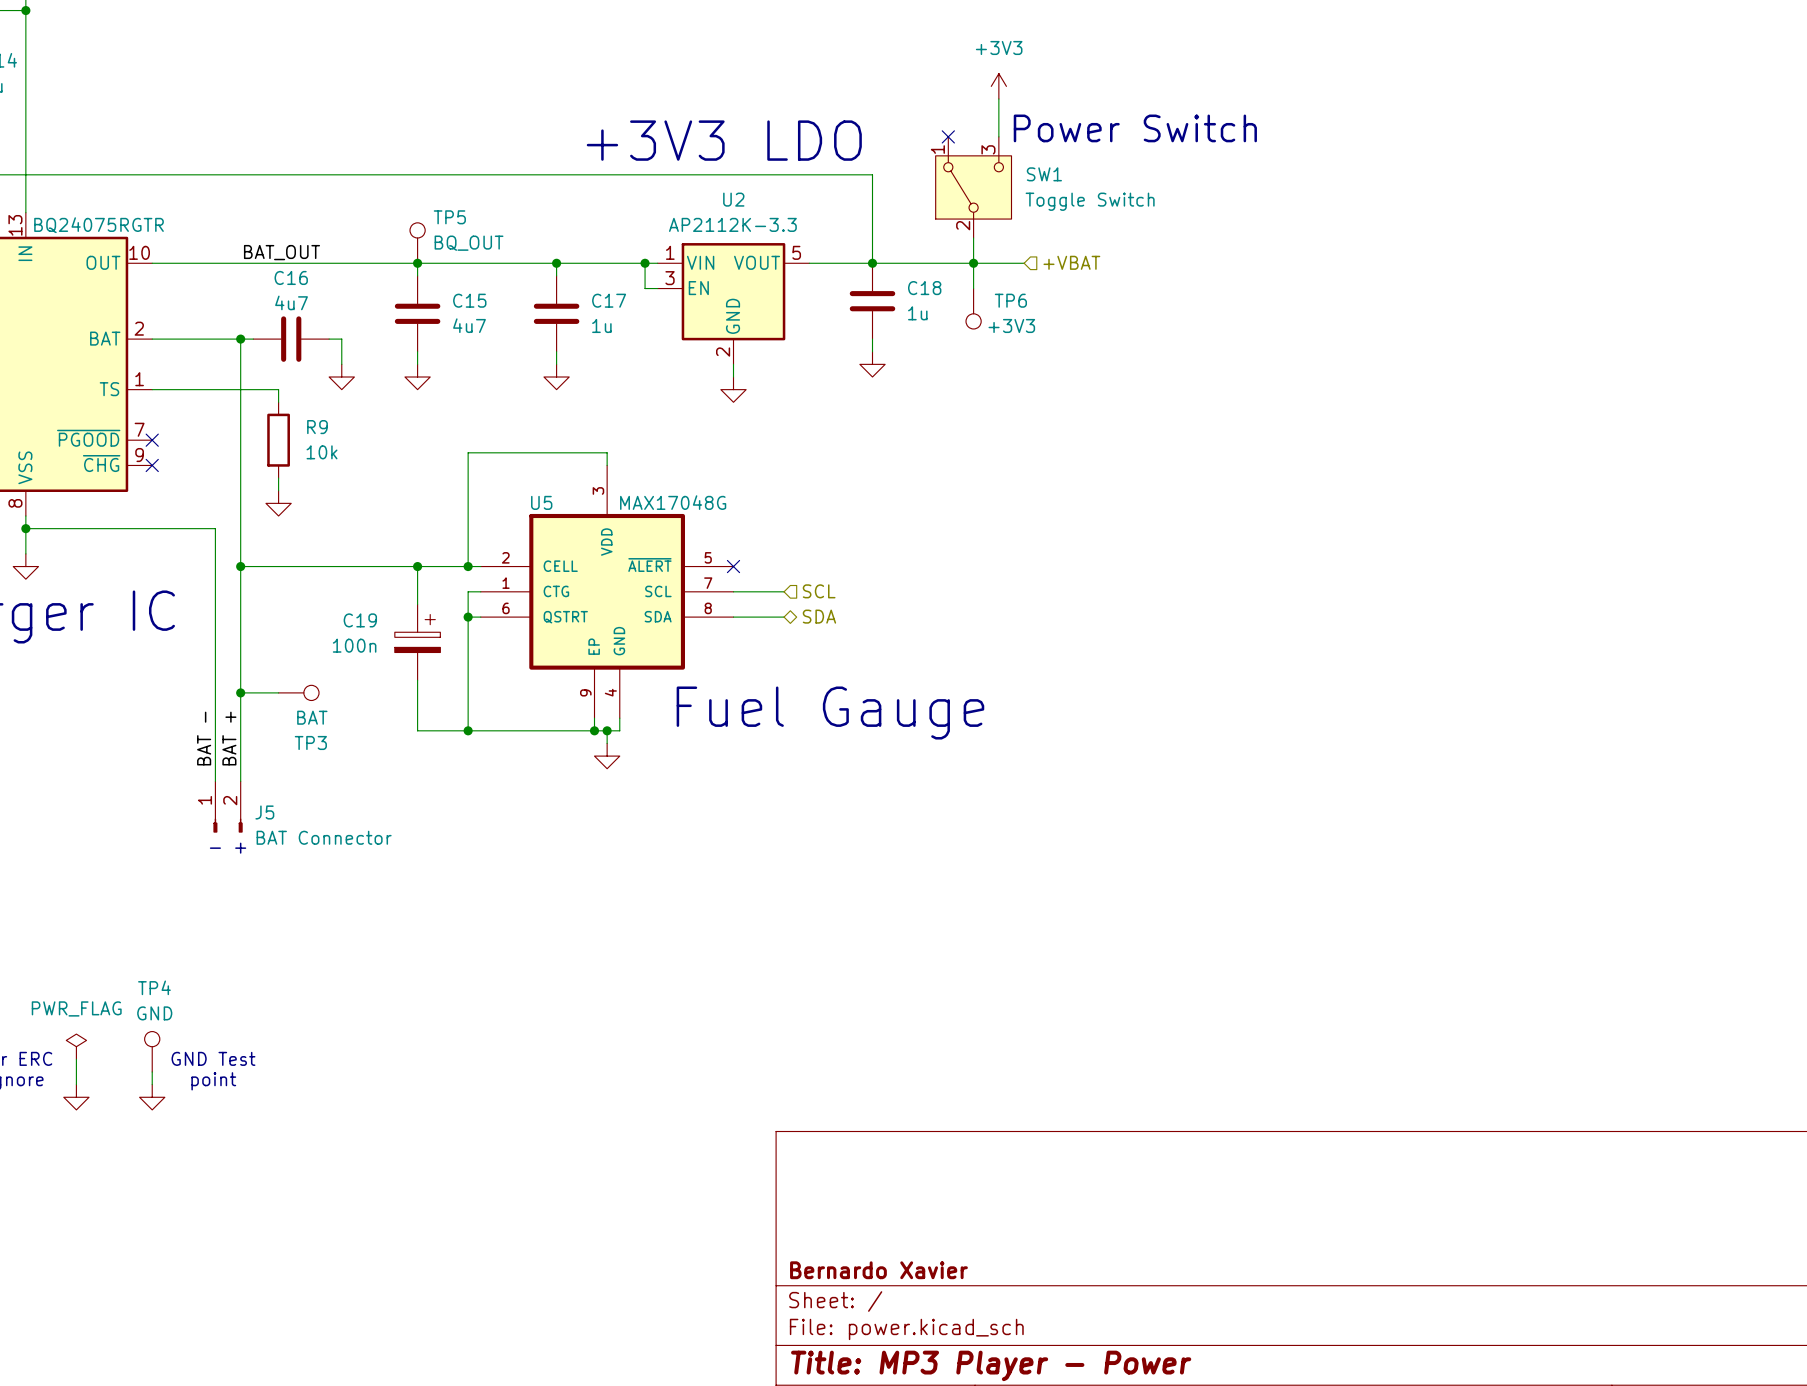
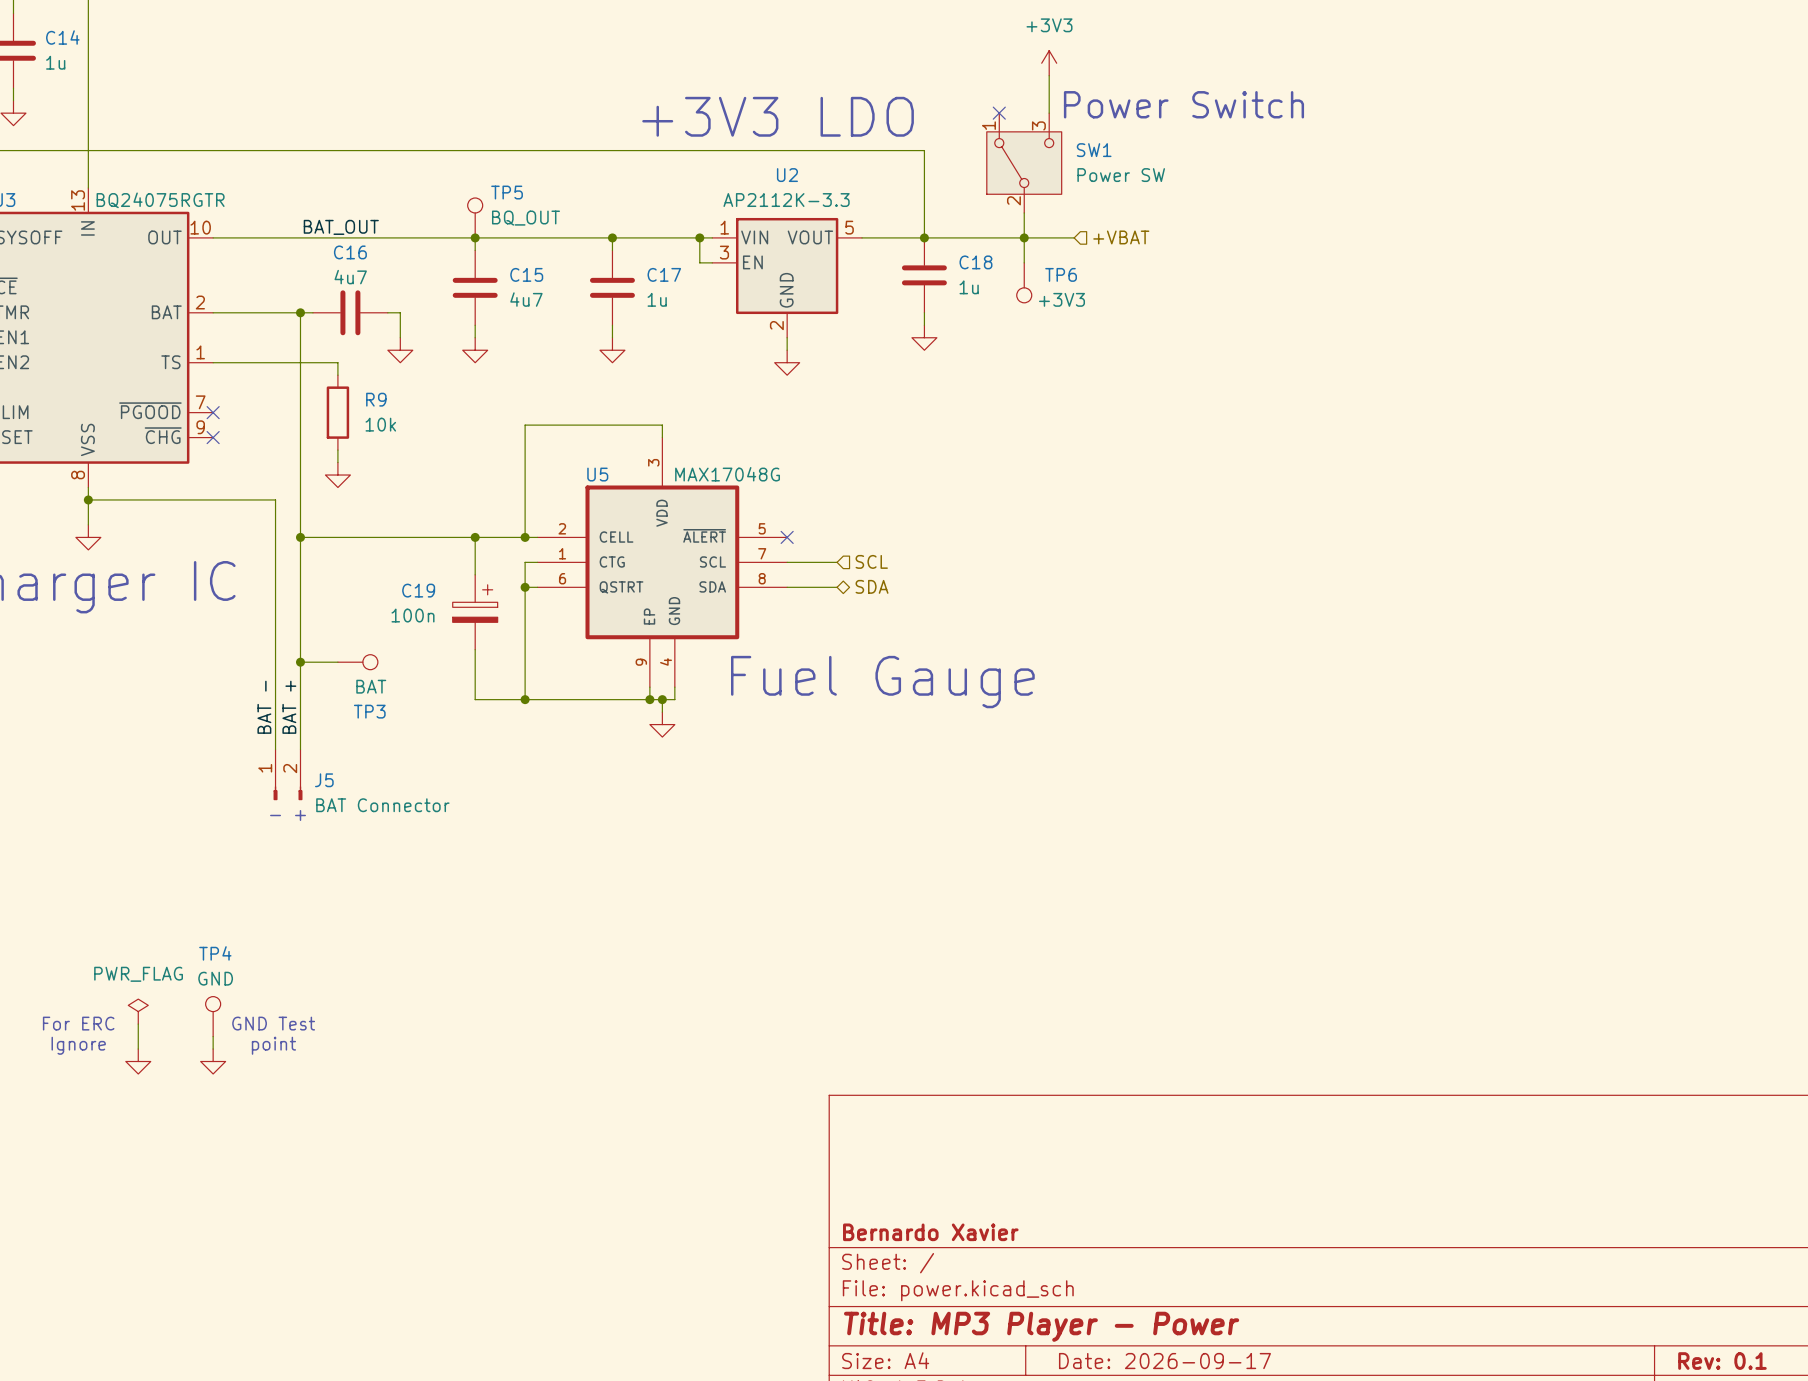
SW1 value: Toggle Switch (1090, 201) -> Power SW (1121, 175)

